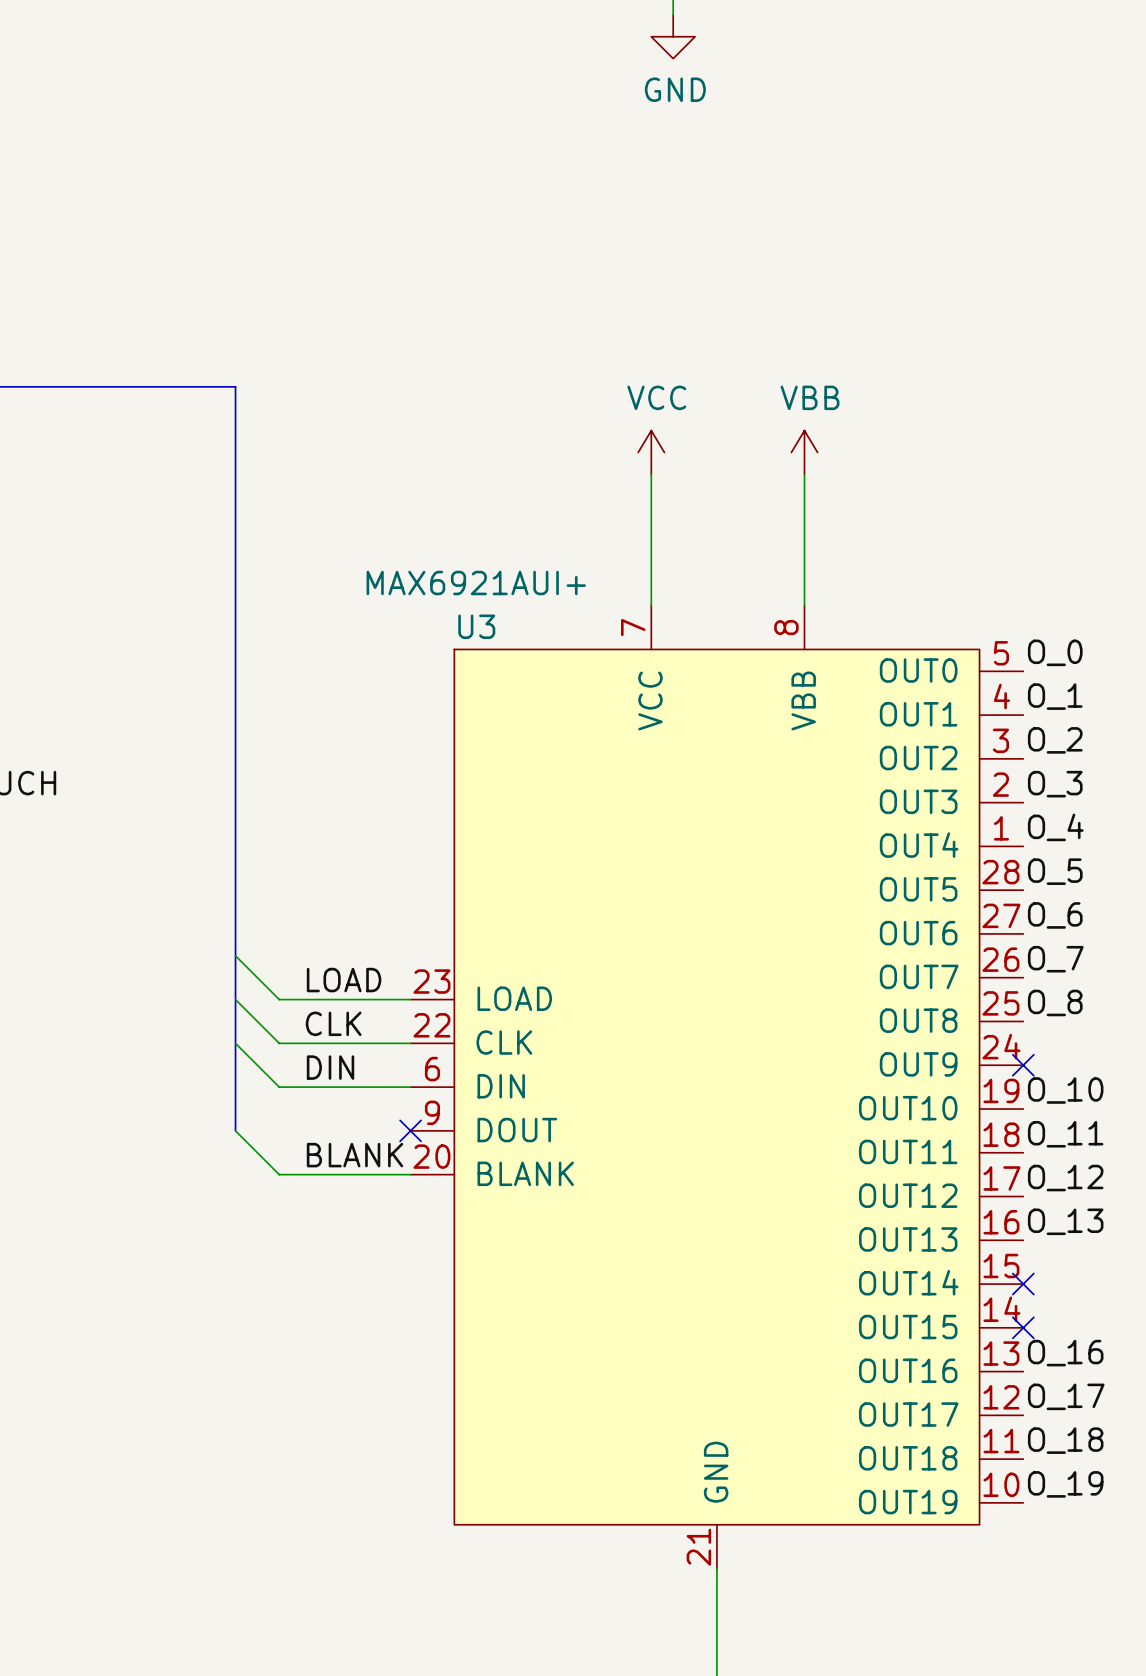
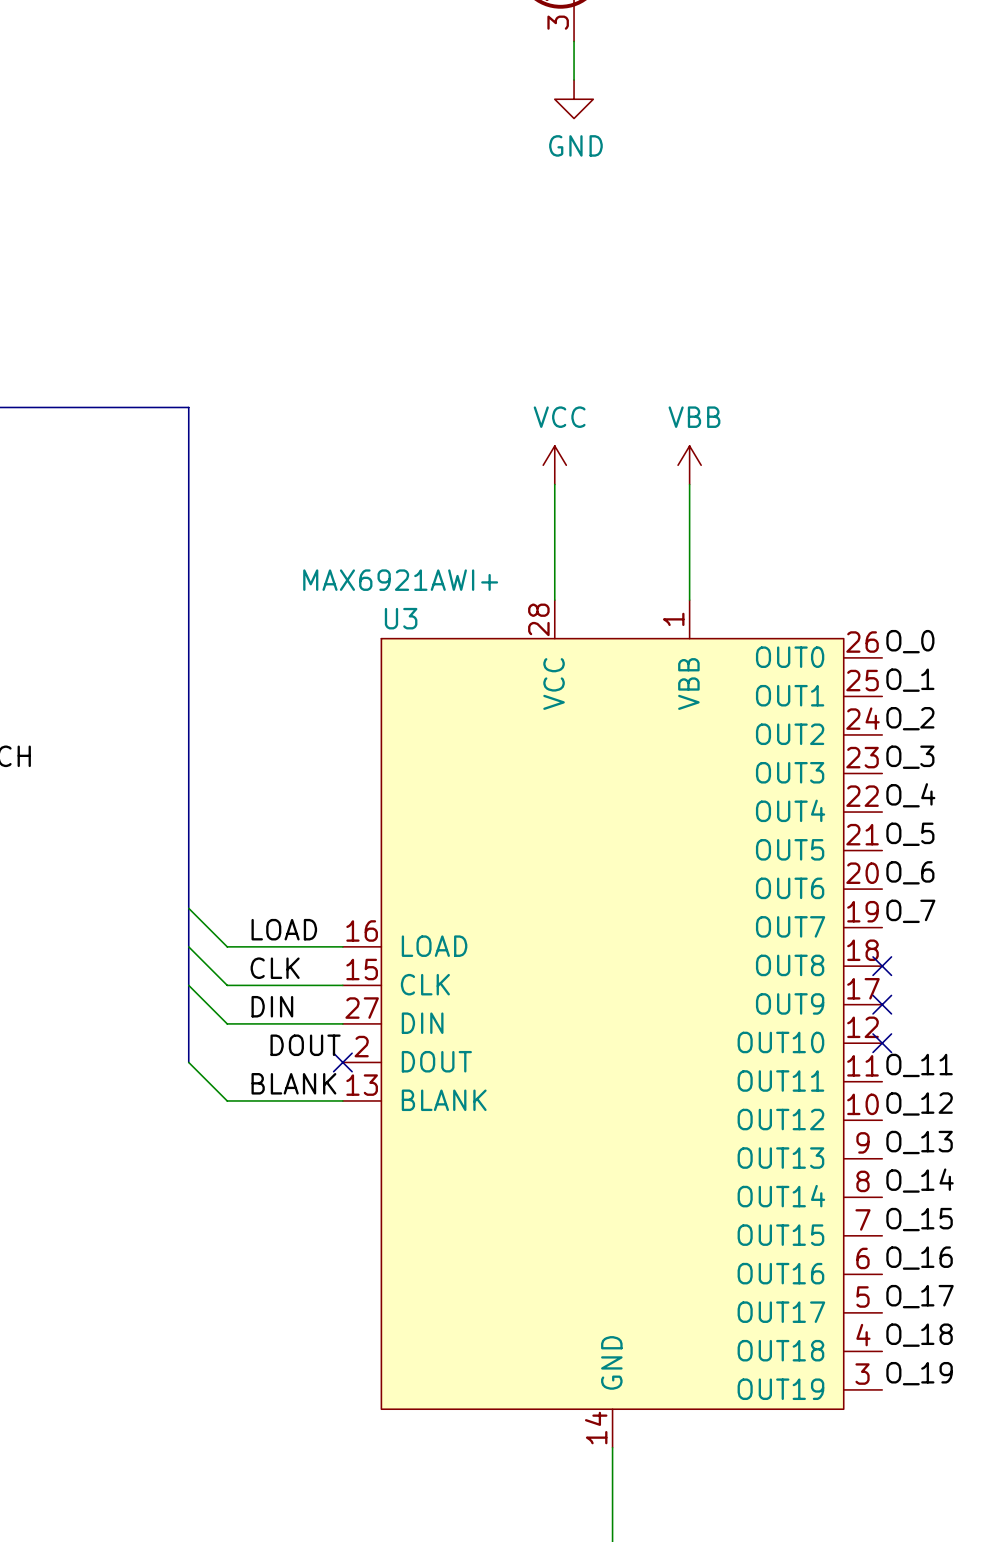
U3 value: MAX6921AUI+ (476, 582) -> MAX6921AWI+ (400, 580)
U3 symbol: [410, 605, 1024, 1569] -> [342, 600, 883, 1448]
label: O_8 (1055, 1002) -> none
no-connect mark: none -> (882, 966)
label: O_10 (1065, 1090) -> none
no-connect mark: none -> (882, 1043)
label: none -> DOUT (305, 1045)
label: none -> O_14 (920, 1180)
no-connect mark: (1023, 1284) -> none
label: none -> O_15 (919, 1219)
no-connect mark: (1023, 1327) -> none

